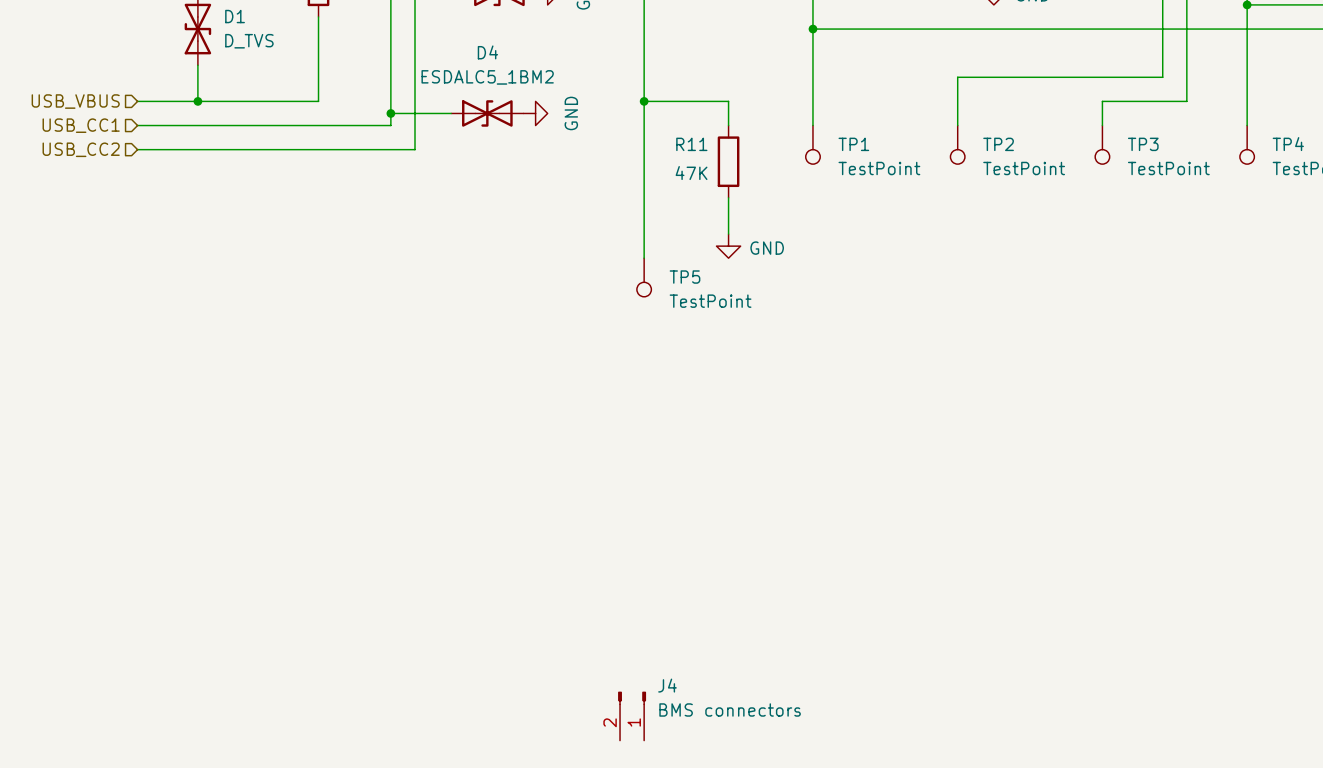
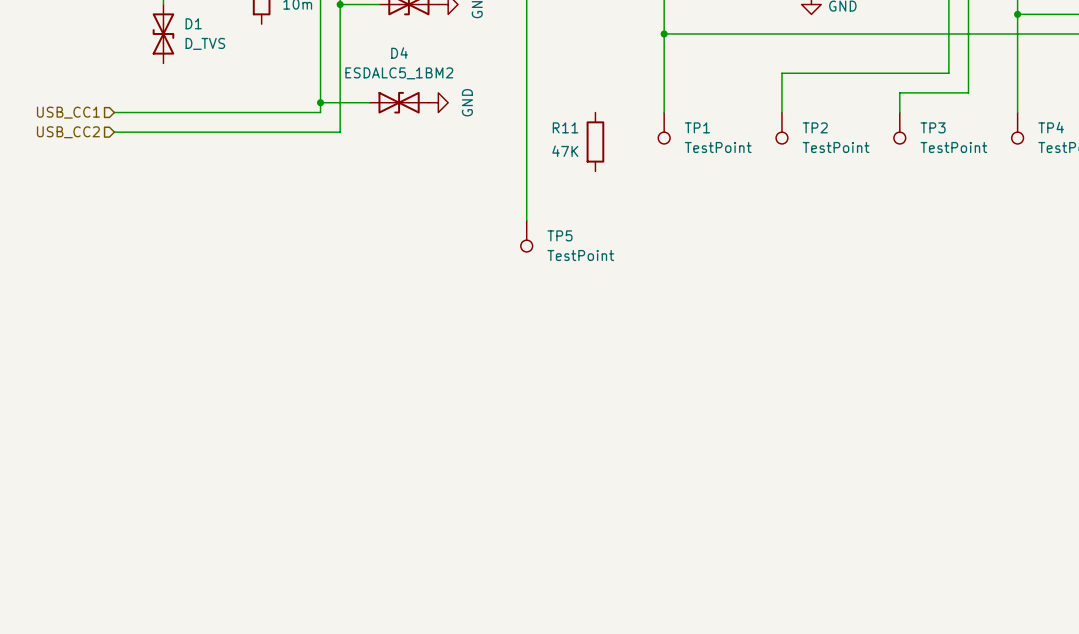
wire: (318, 16) (318, 101) (137, 101) -> none
wire: (197, 65) (197, 101) -> none
hierarchical label: USB_VBUS (75, 101) -> none
junction: (197, 101) -> none
wire: (644, 101) (728, 101) (728, 125) -> none
junction: (644, 101) -> none
wire: (728, 197) (728, 234) -> none
power symbol: GND (728, 246) -> none
J4: BMS connectors (632, 716) -> none

